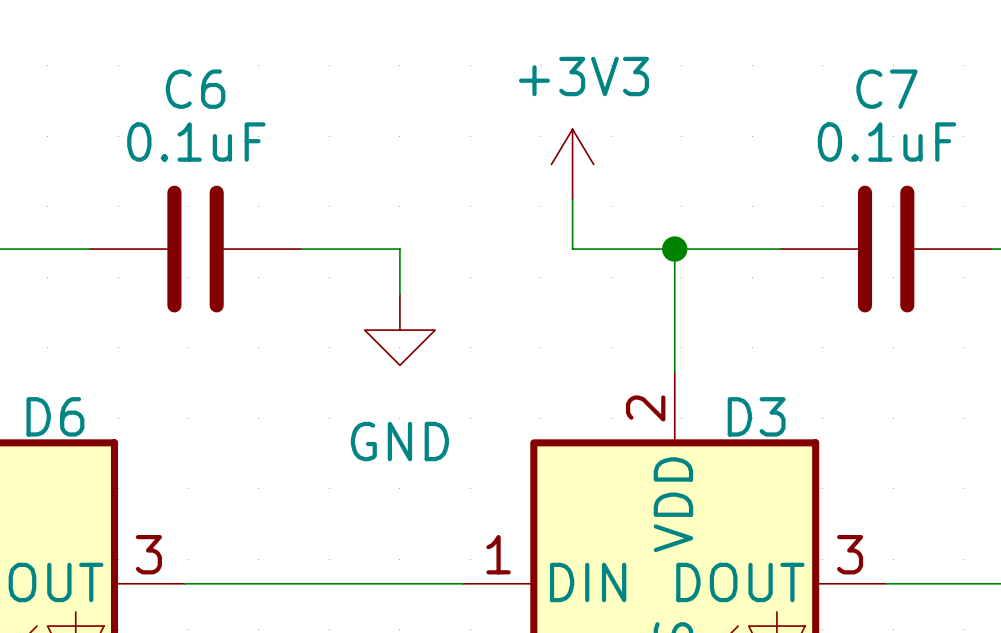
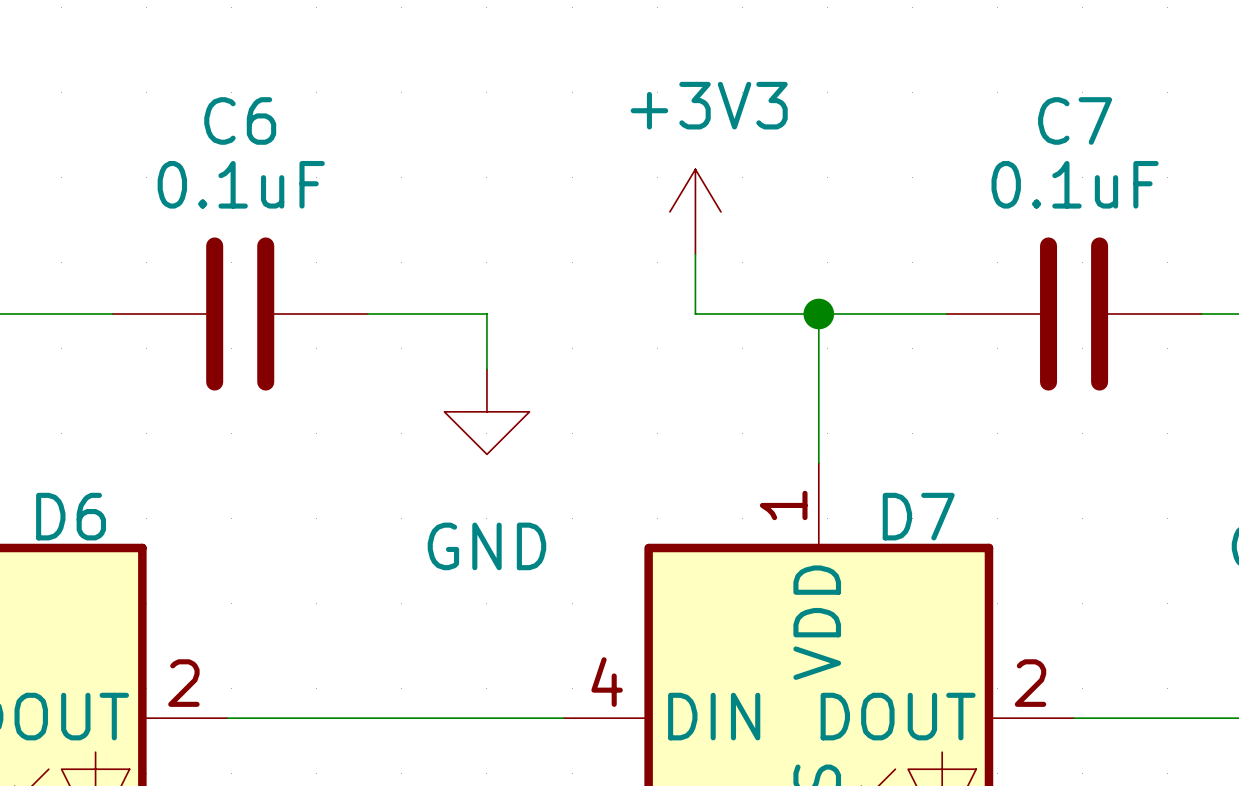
D3 pin number: 2 (645, 408) -> 1 (783, 505)
D3 name: D3 (756, 416) -> D7 (918, 516)
D6 pin number: 3 (148, 554) -> 2 (183, 683)
D3 pin number: 1 (498, 554) -> 4 (607, 682)
D3 pin number: 3 (850, 554) -> 2 (1030, 683)

